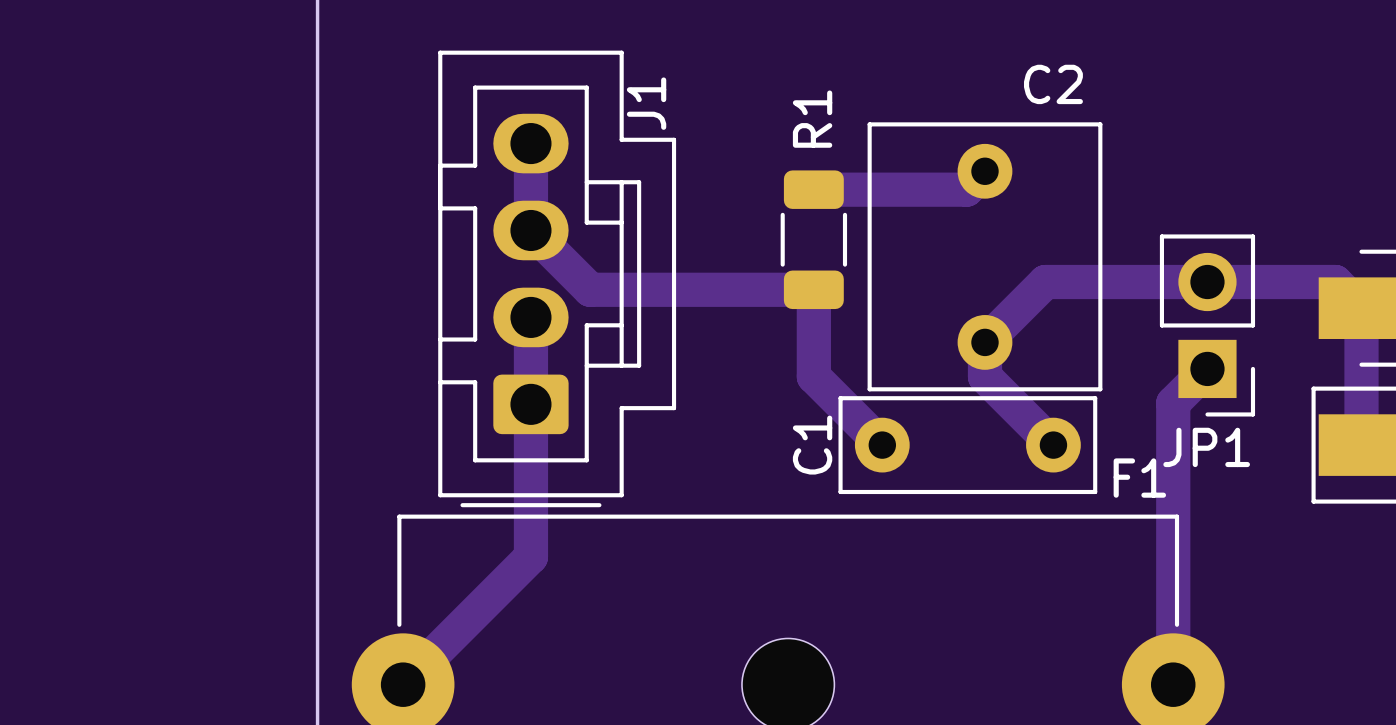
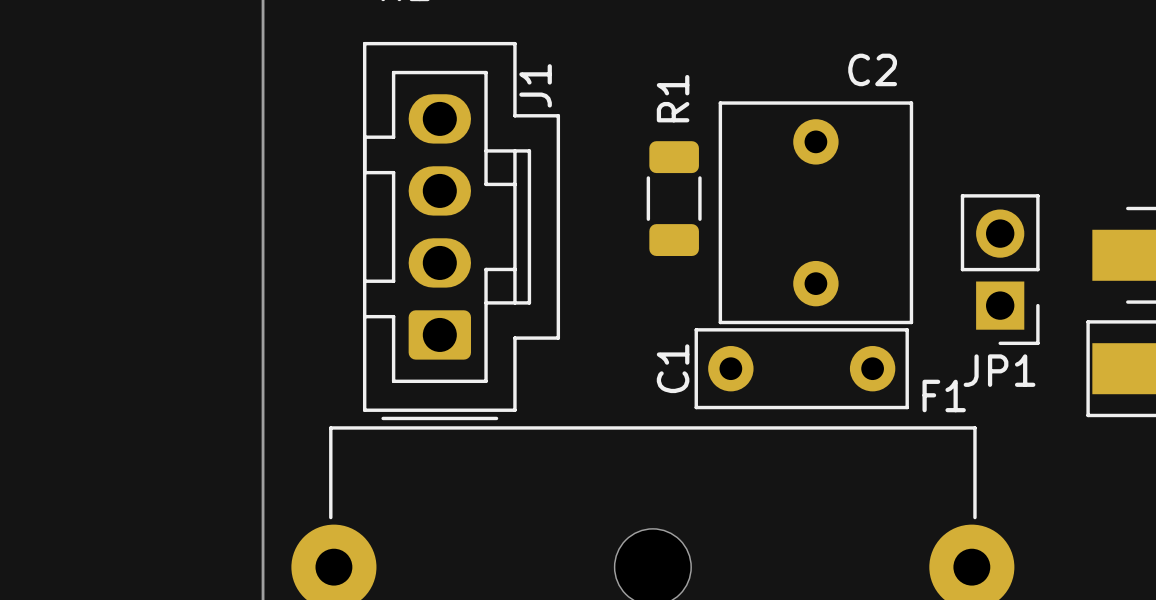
track: (530, 143) (530, 230) (590, 289) (813, 289) (813, 376) (882, 445) -> none
track: (984, 171) (966, 189) (813, 189) -> none
track: (530, 317) (530, 556) (403, 684) -> none
track: (1207, 368) (1173, 403) (1173, 684) -> none
track: (1053, 445) (984, 376) (984, 342) (1045, 282) (1335, 282) (1361, 308) (1361, 445) -> none

